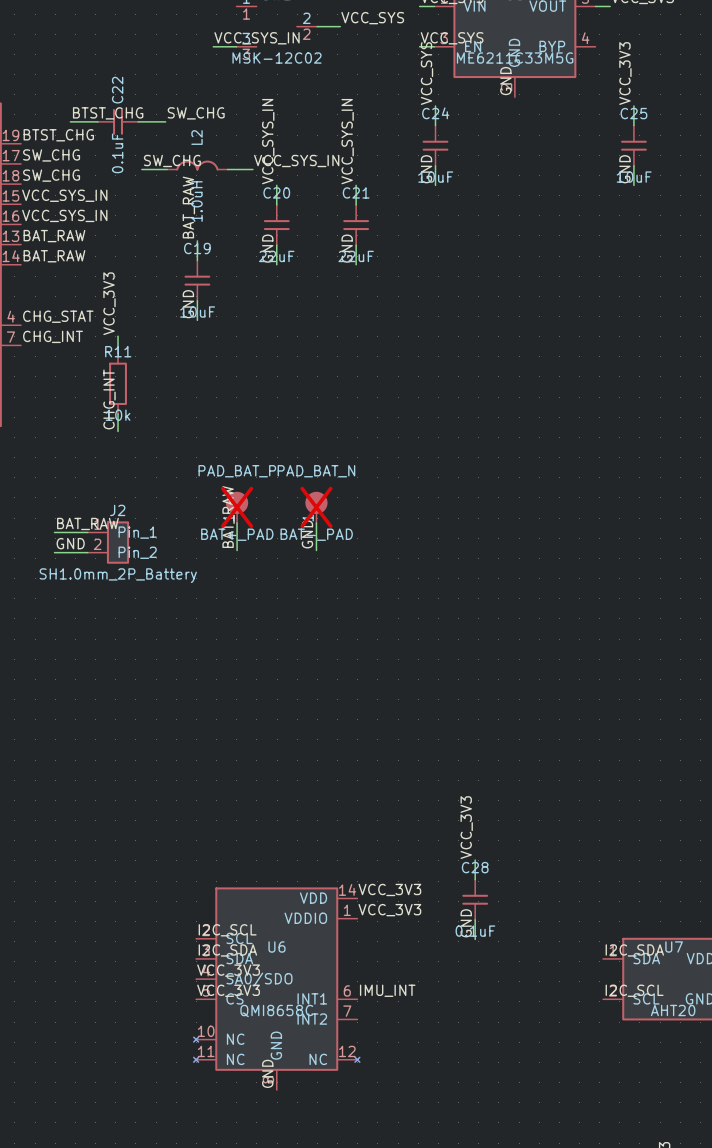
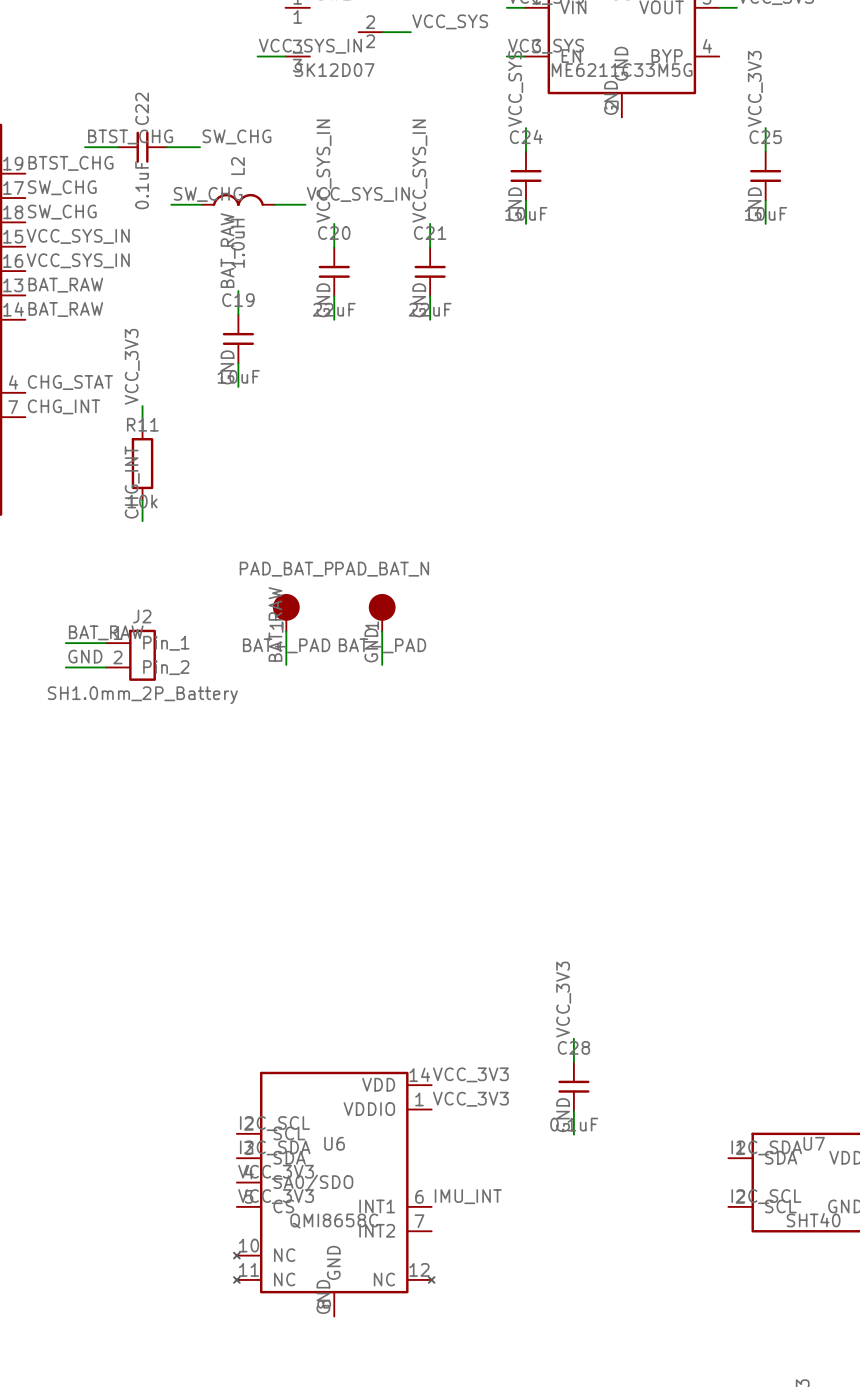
part value: MSK-12C02 (277, 58) -> SK12D07 (334, 70)
PAD_BAT_P do-not-place cross: (237, 507) -> none
PAD_BAT_N do-not-place cross: (316, 507) -> none
U7 value: AHT20 (673, 1010) -> SHT40 (813, 1220)

